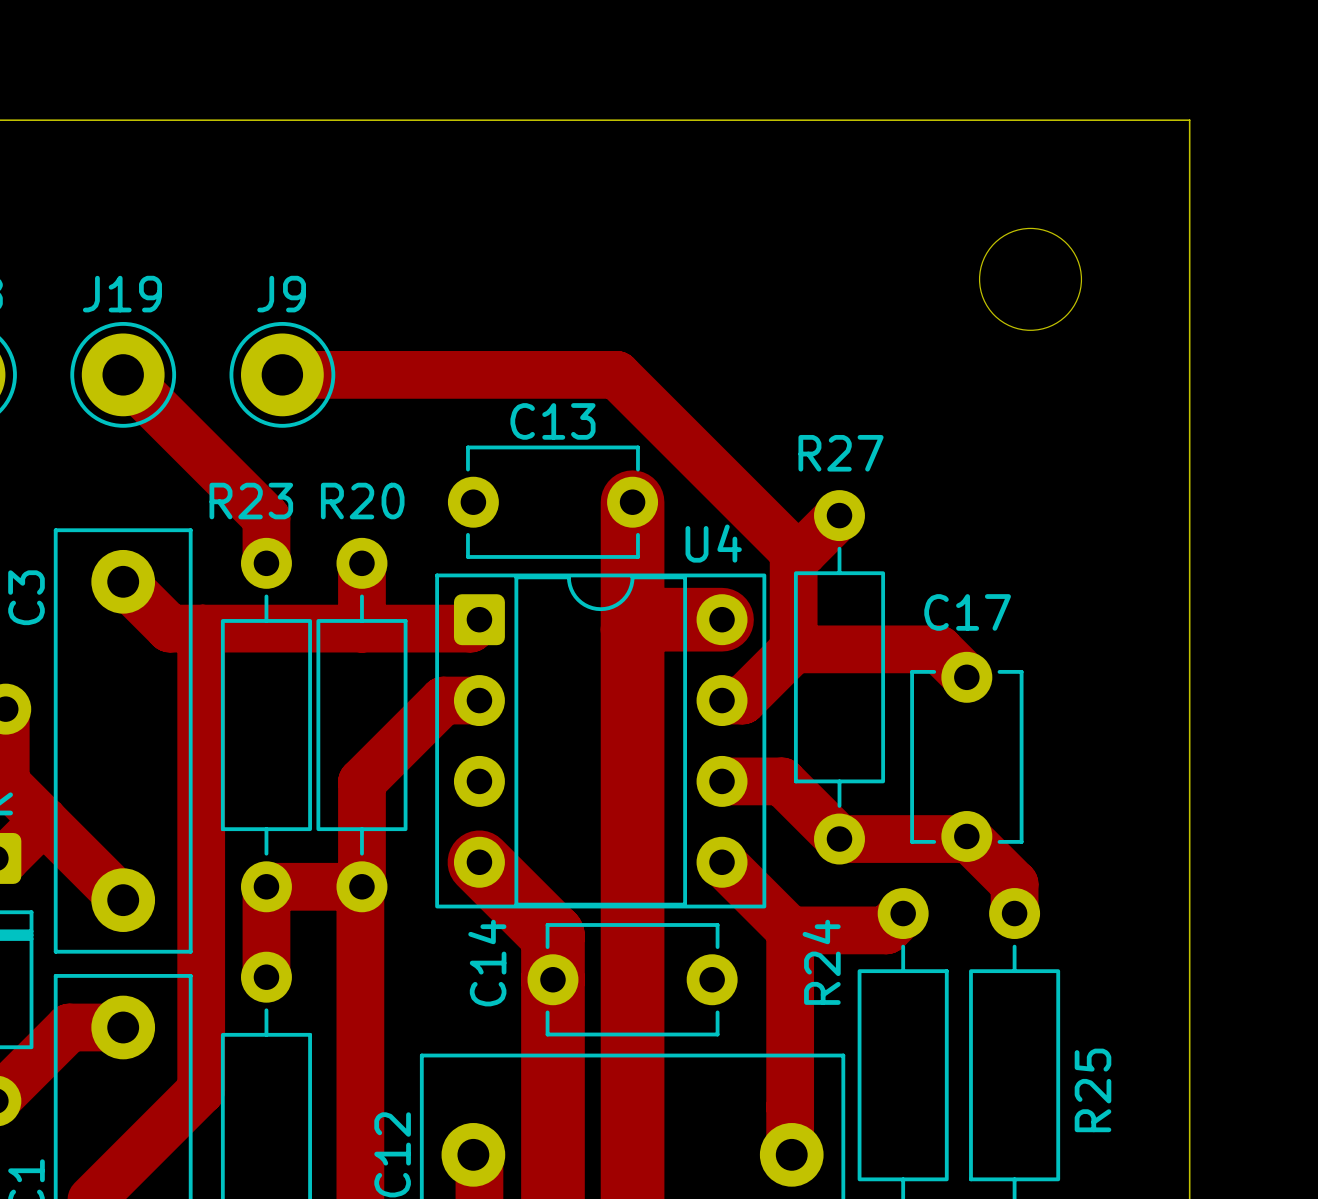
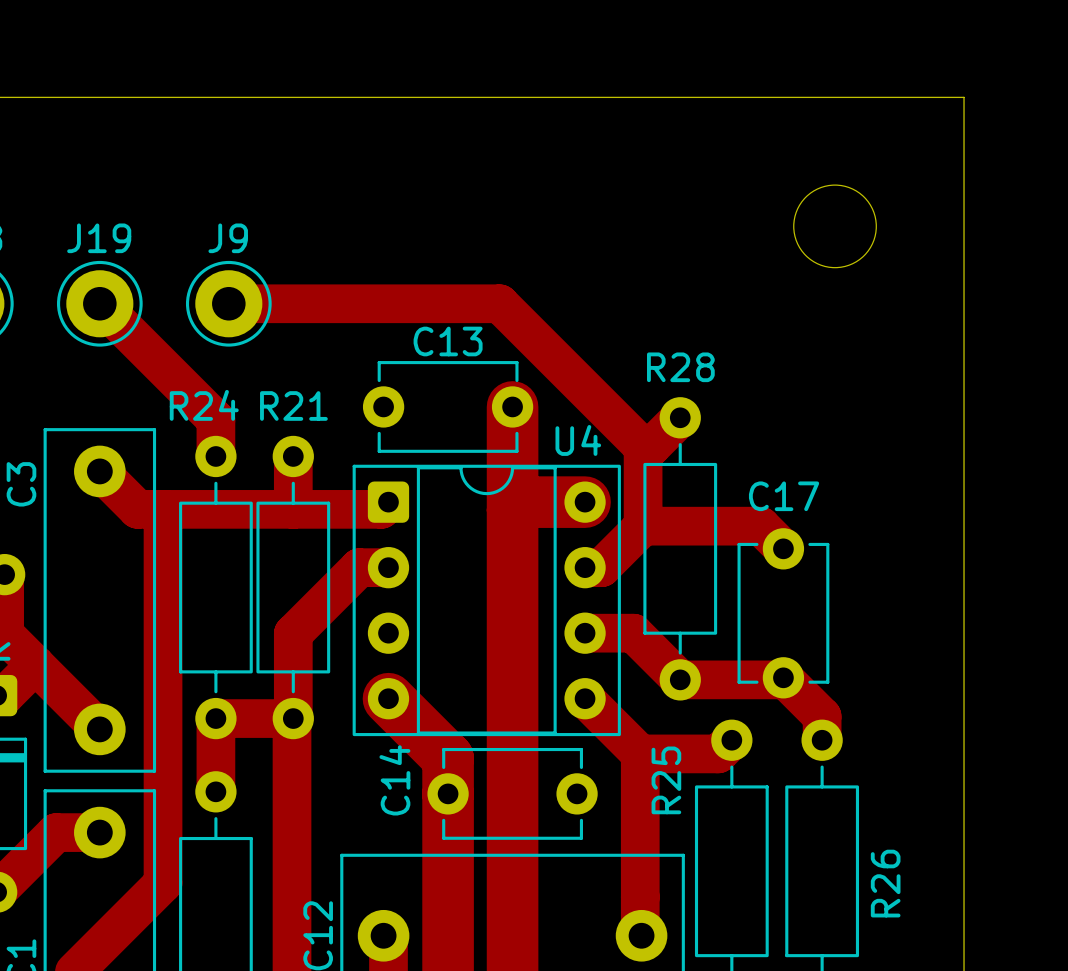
R27 name: R27 (841, 453) -> R28 (680, 367)
R23 name: R23 (251, 501) -> R24 (204, 405)
R20 name: R20 (362, 501) -> R21 (293, 405)
R24 name: R24 (821, 962) -> R25 (666, 780)
R25 name: R25 (1092, 1090) -> R26 (885, 883)

